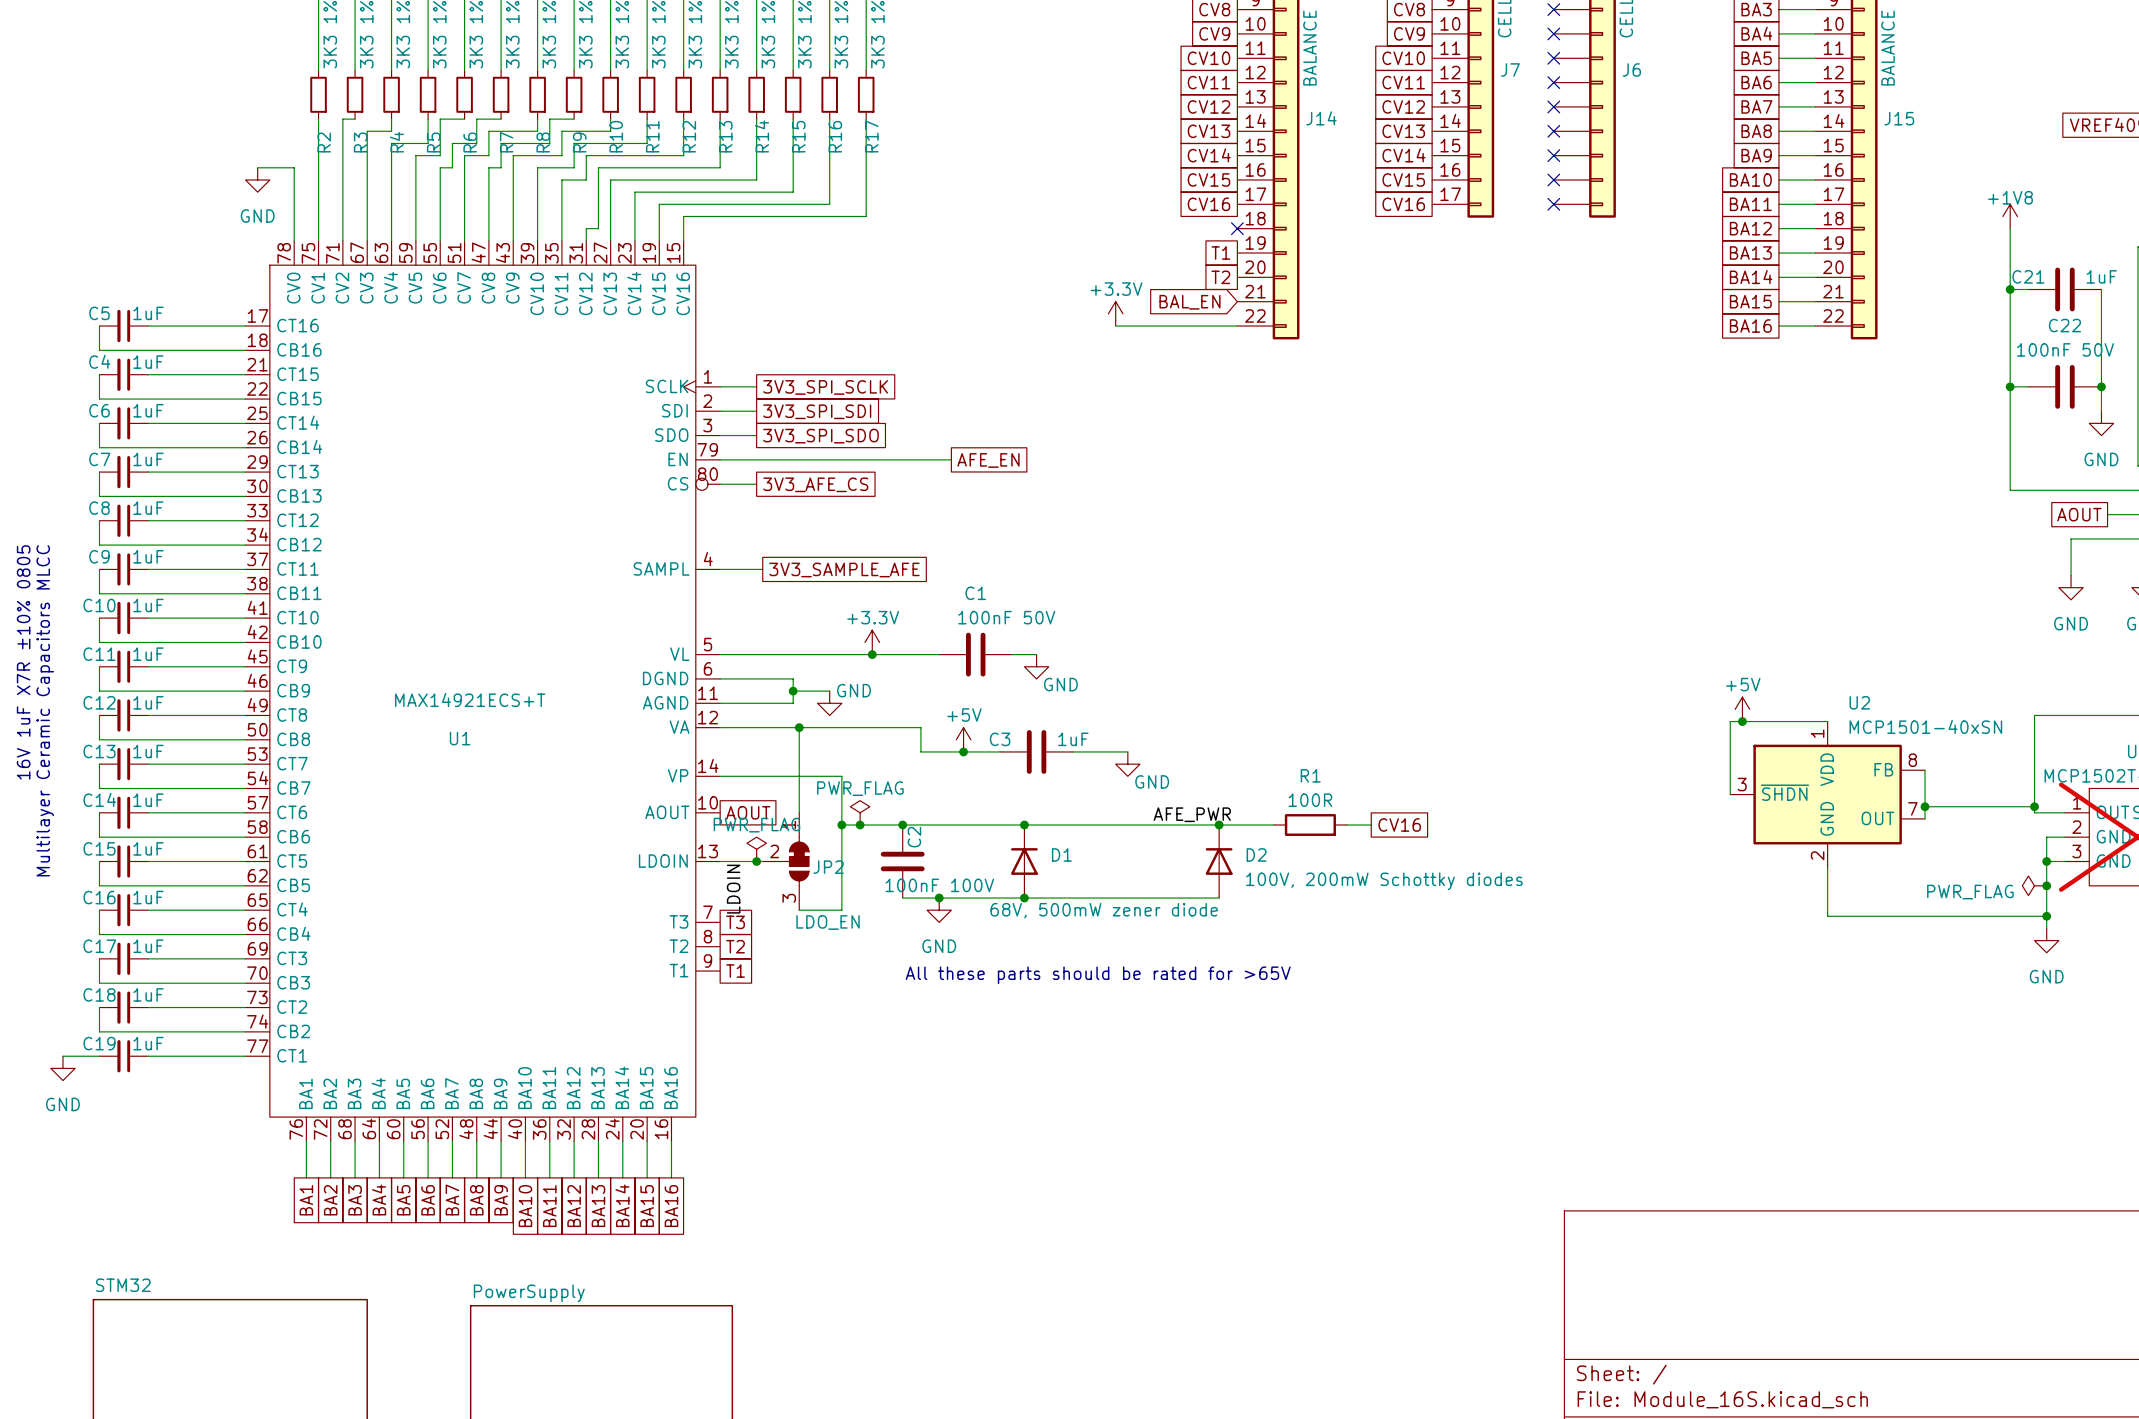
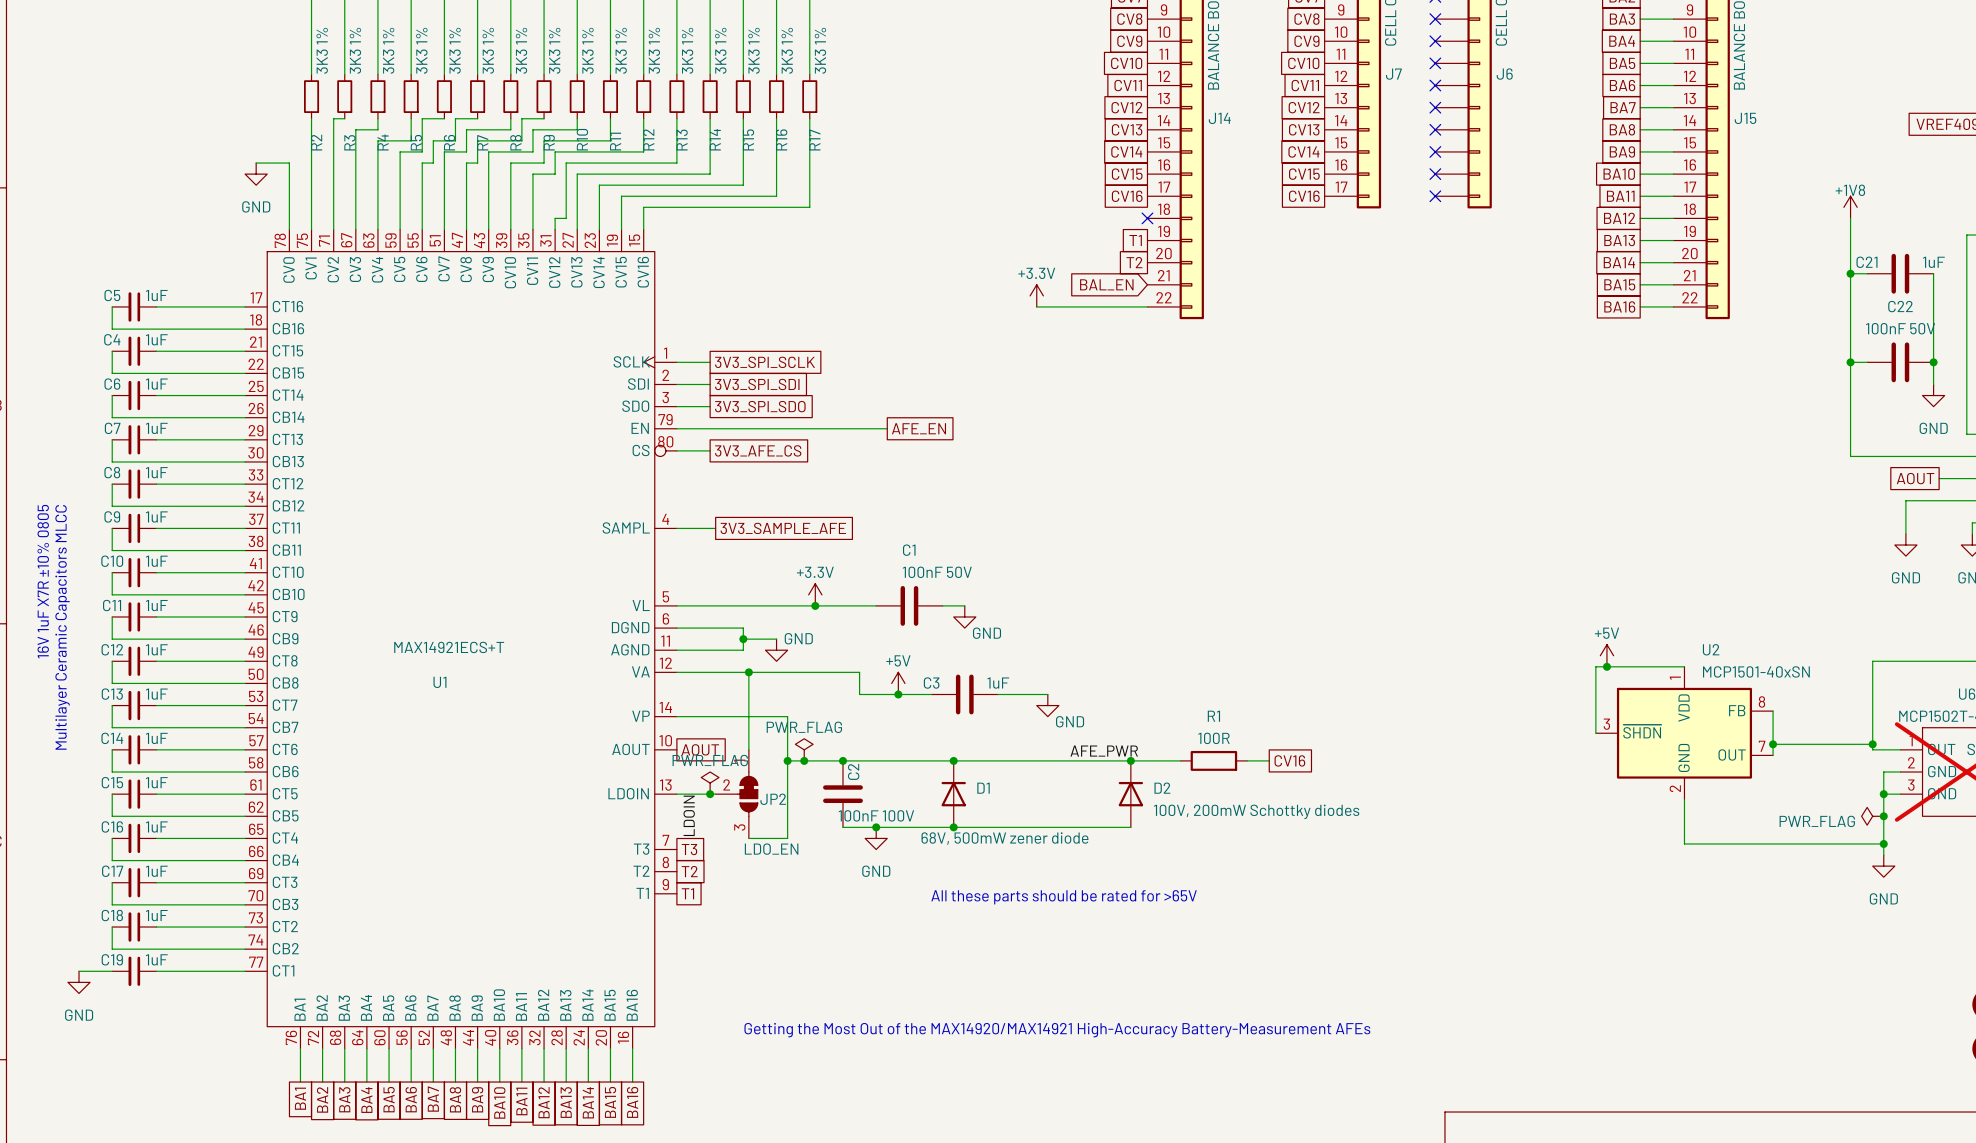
text: none -> Getting the Most Out of the MAX14920/MAX14921 High-Accuracy Battery-Measurement AFEs (1057, 1030)

